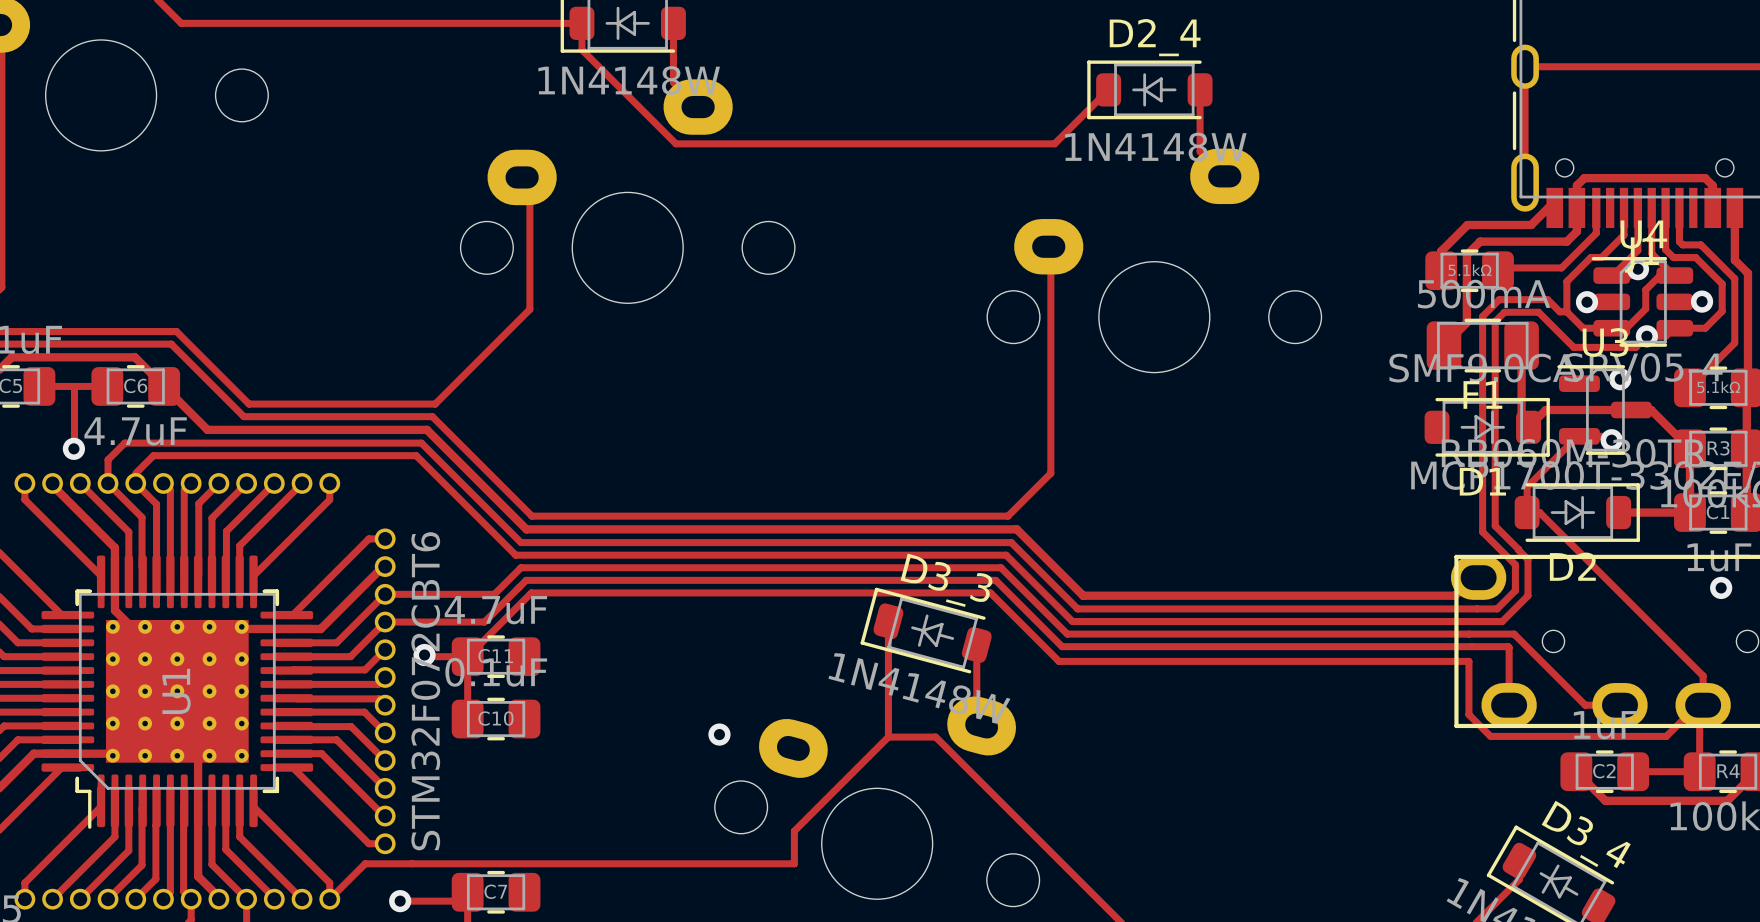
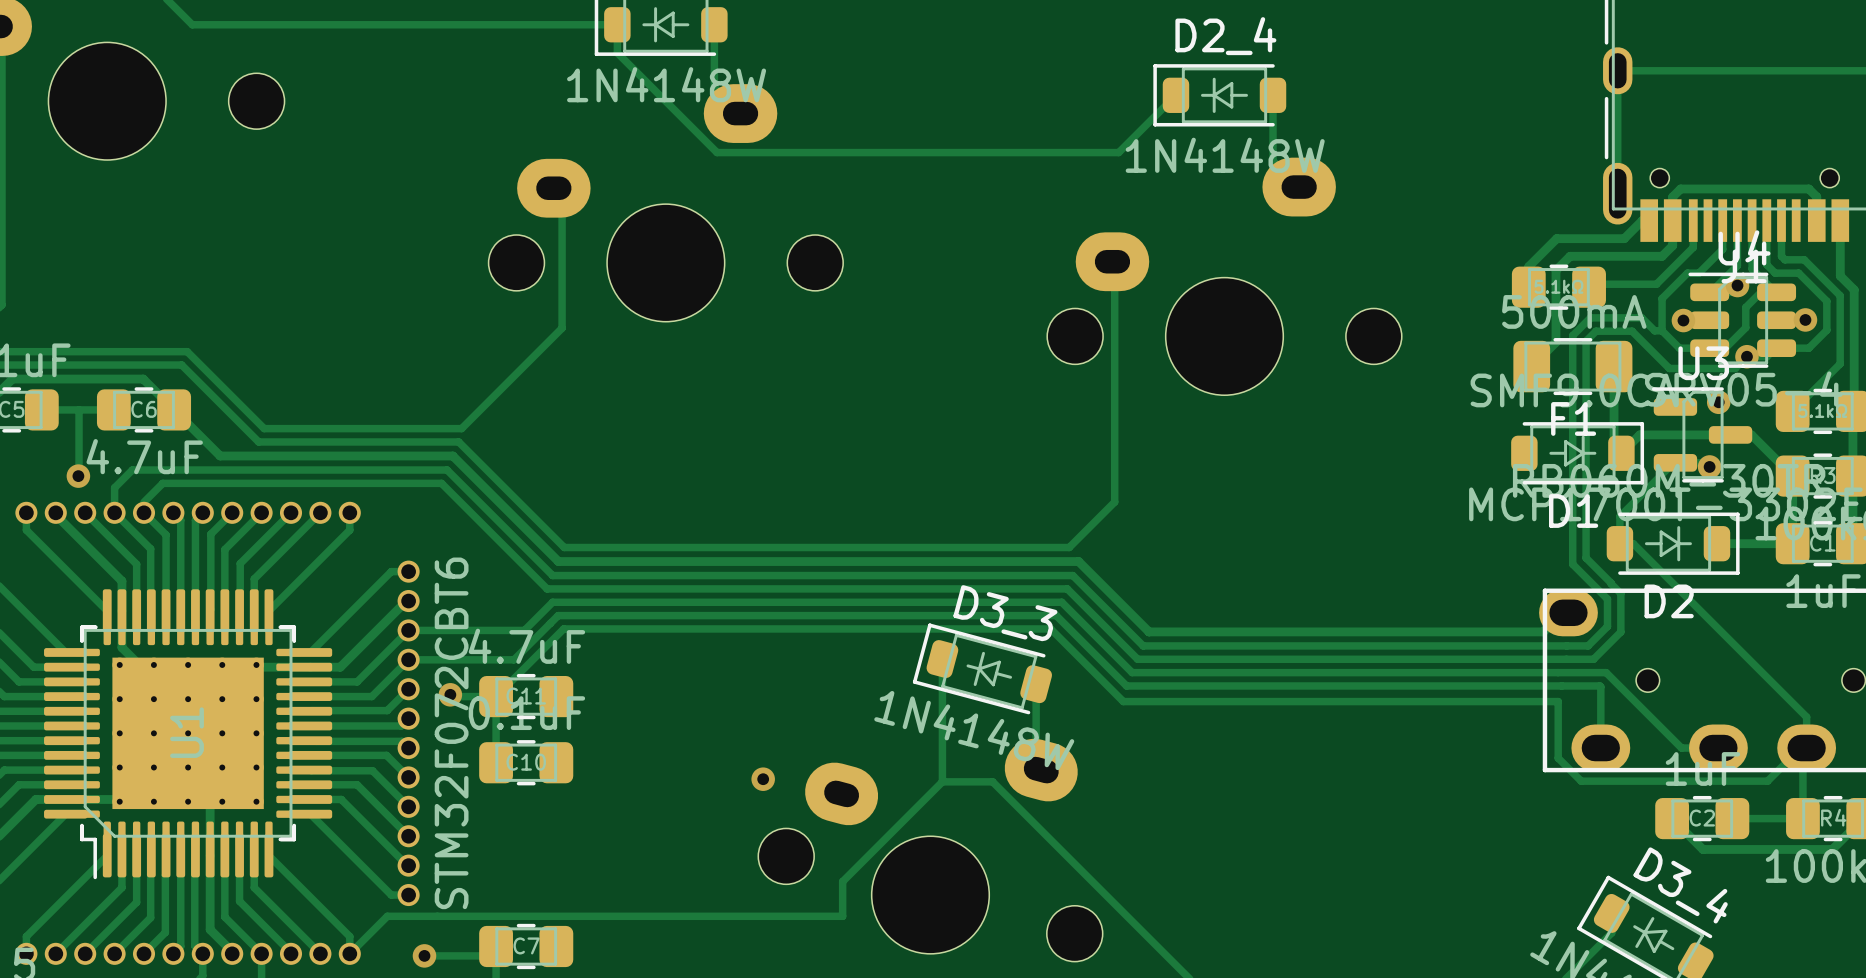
via: (1721, 587) -> none

